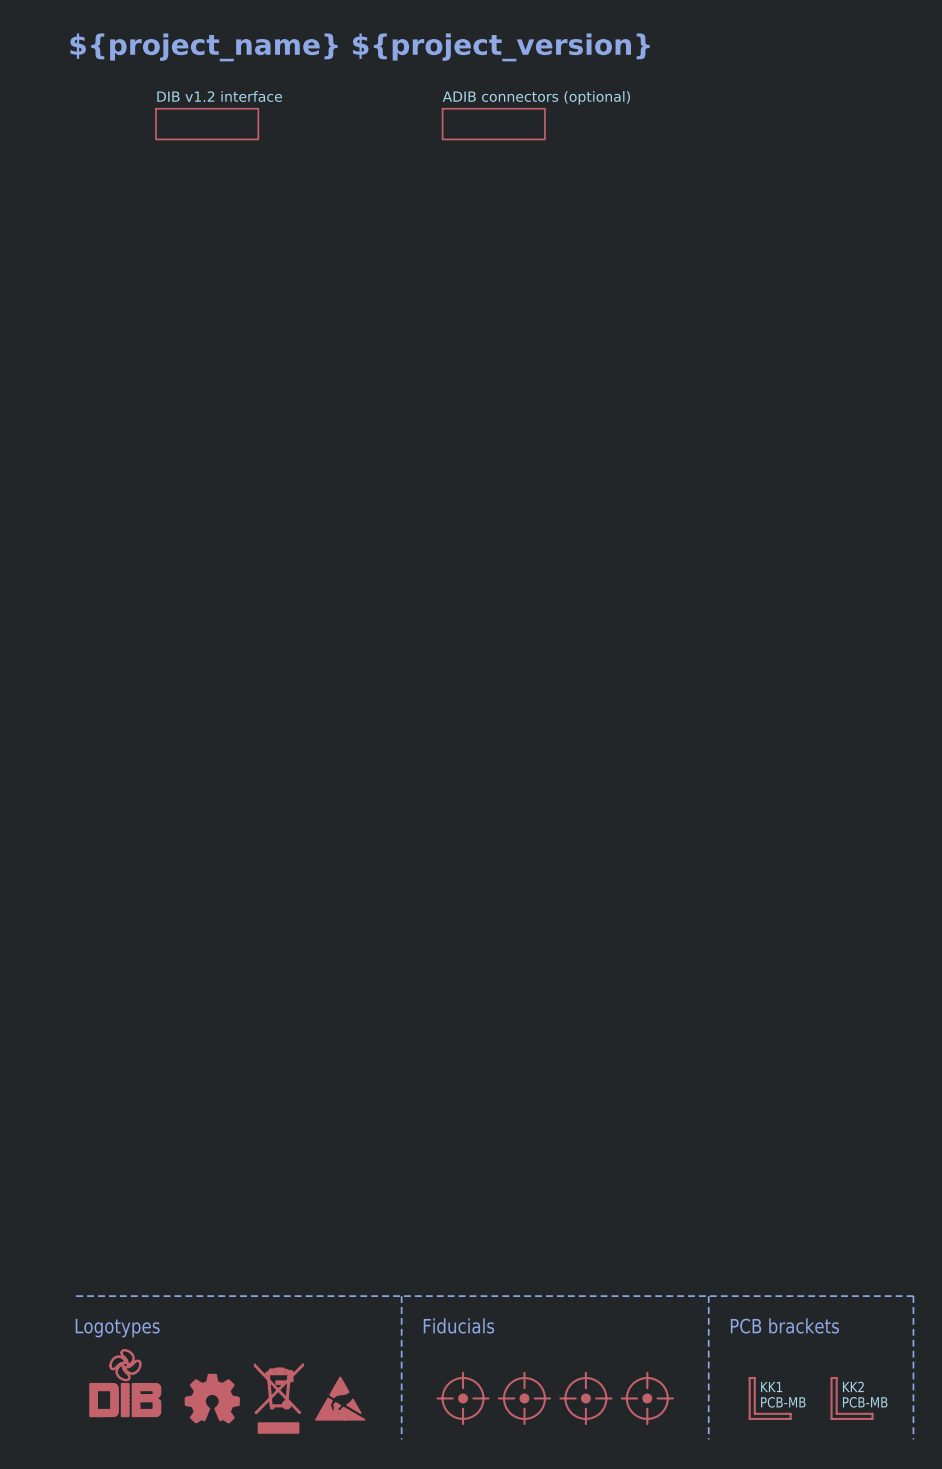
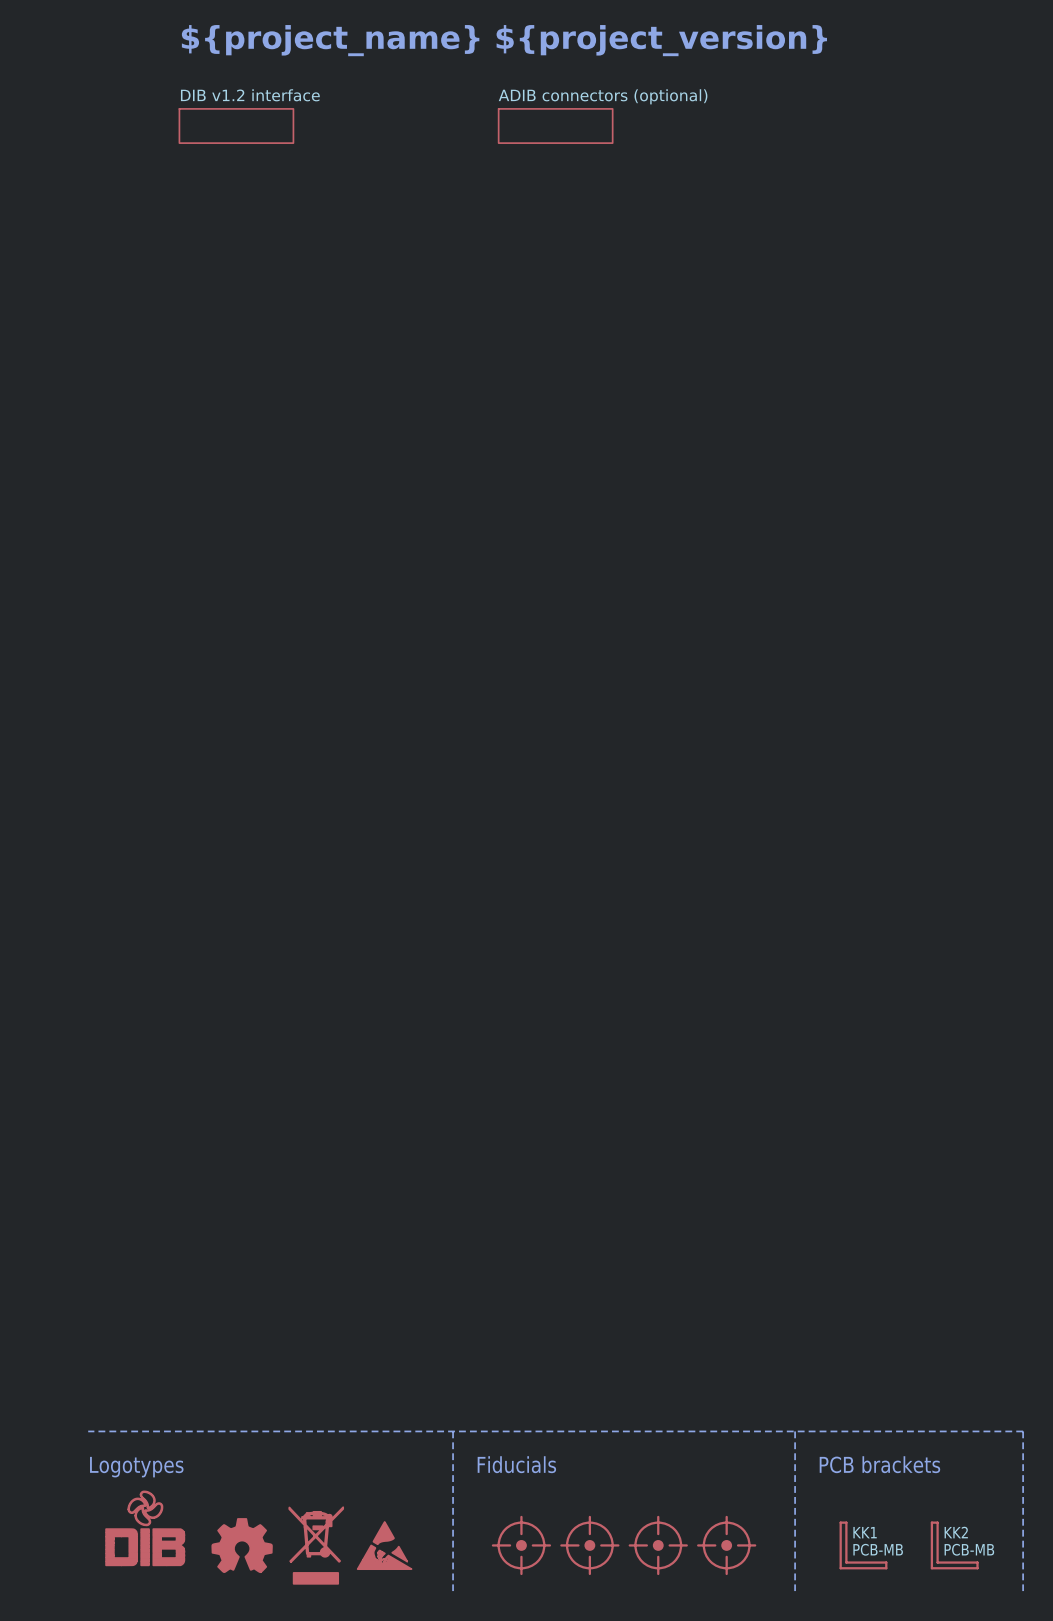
text: ${project_name} ${project_version} (360, 47) -> none
text: none -> ${project_name} ${project_version} (504, 40)

